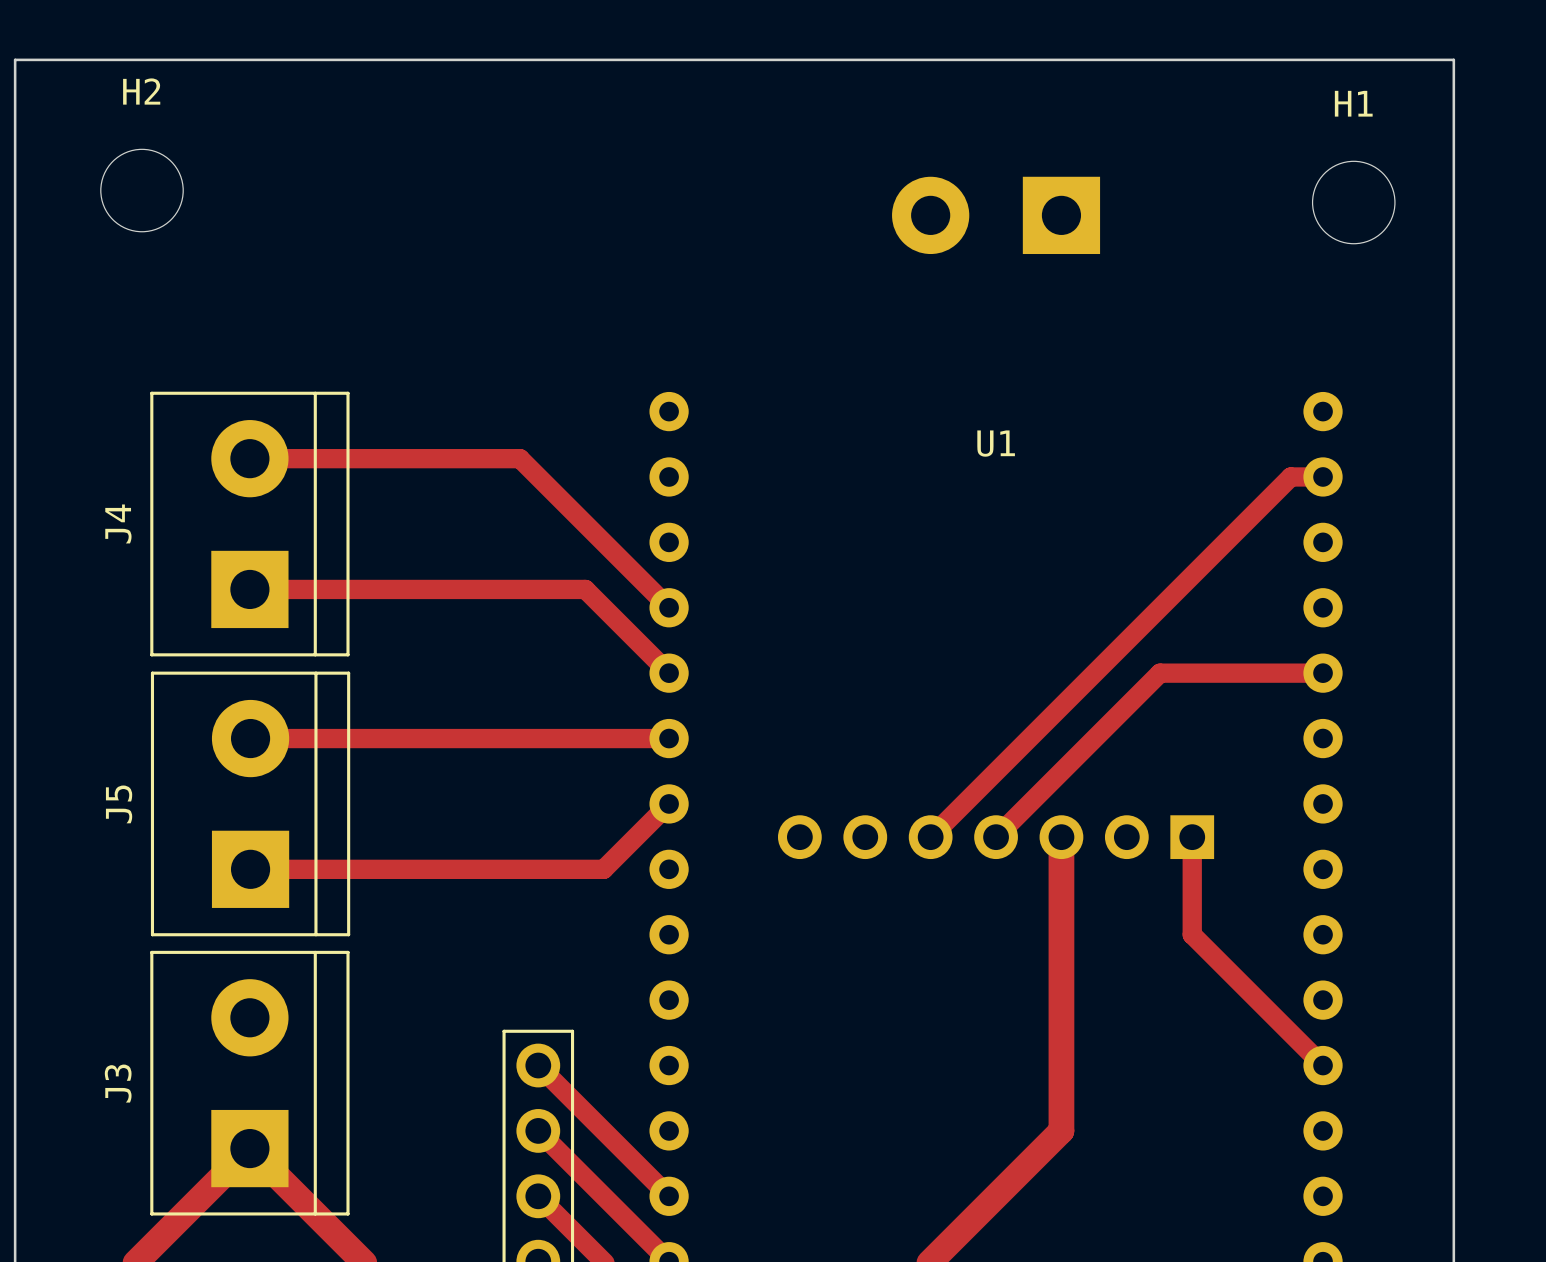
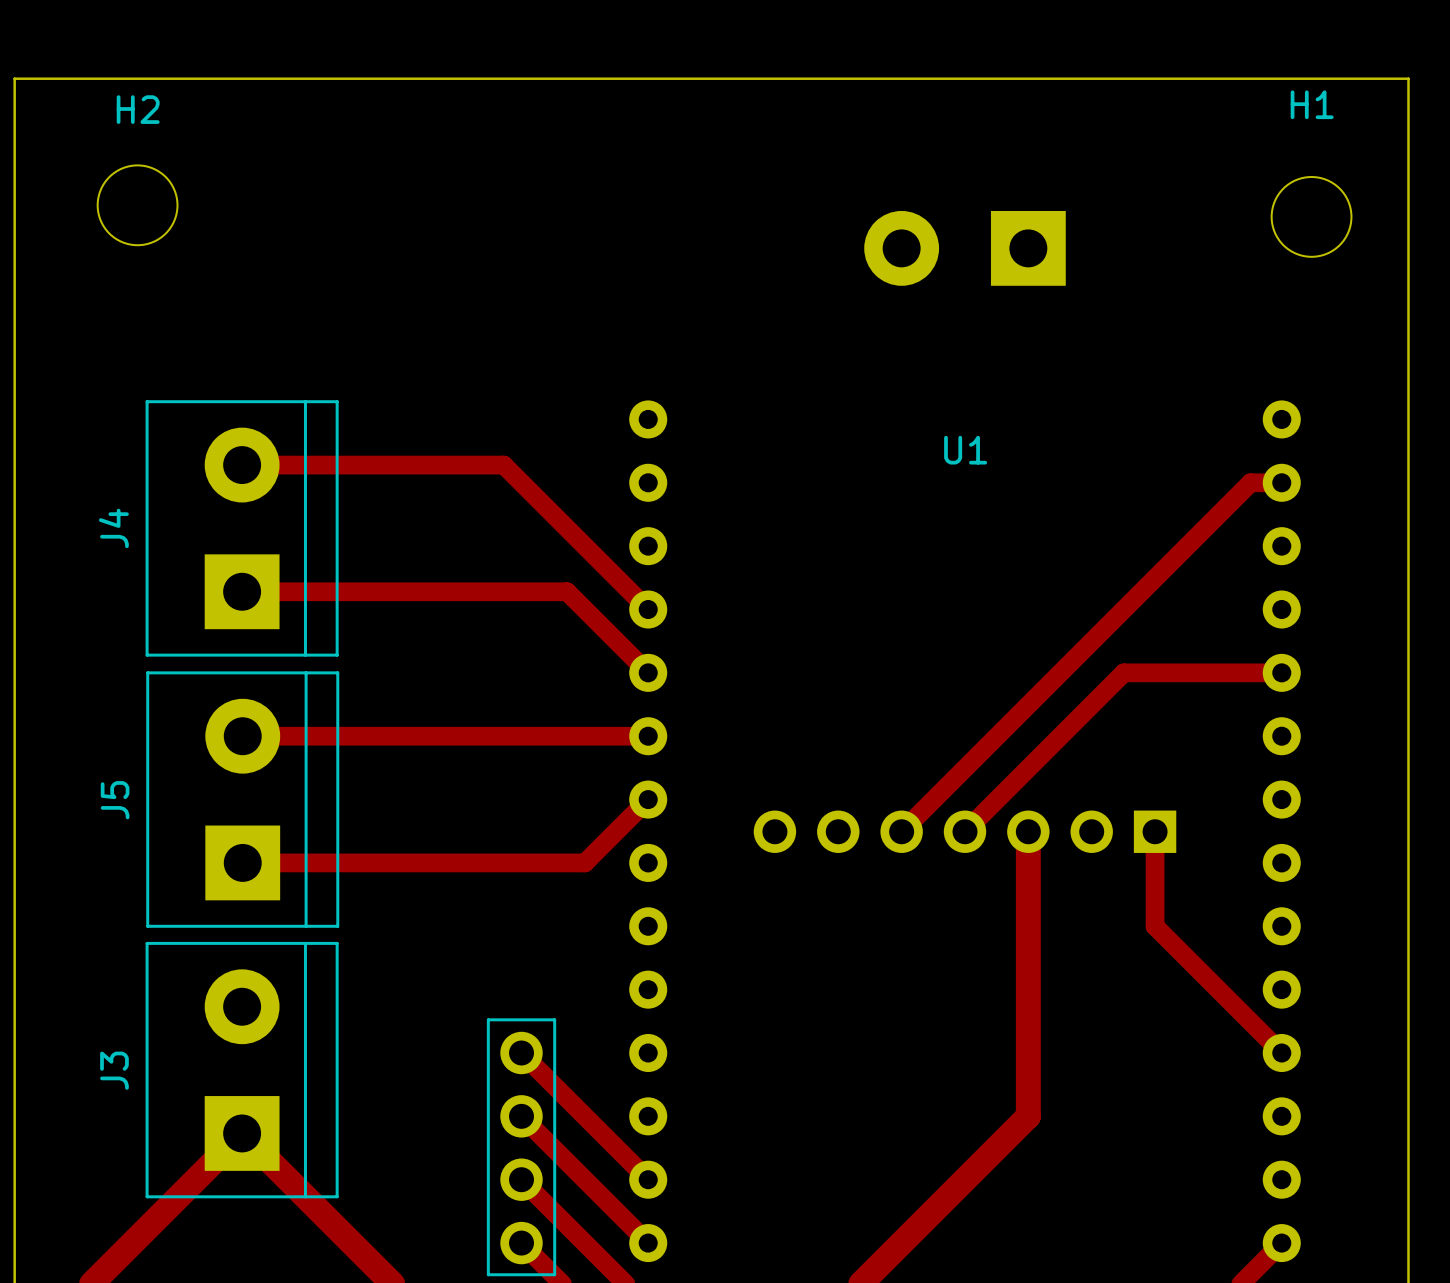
H1 name position: H1 (1353, 103) -> H1 (1312, 104)
part position: (996, 215) -> (965, 248)

